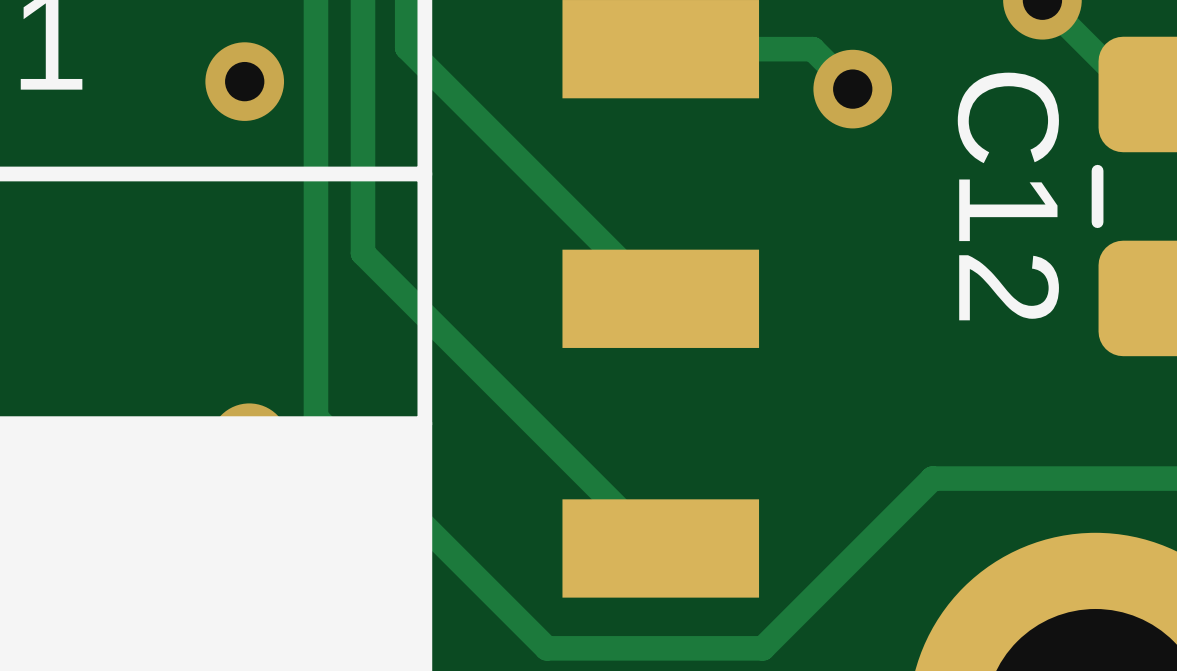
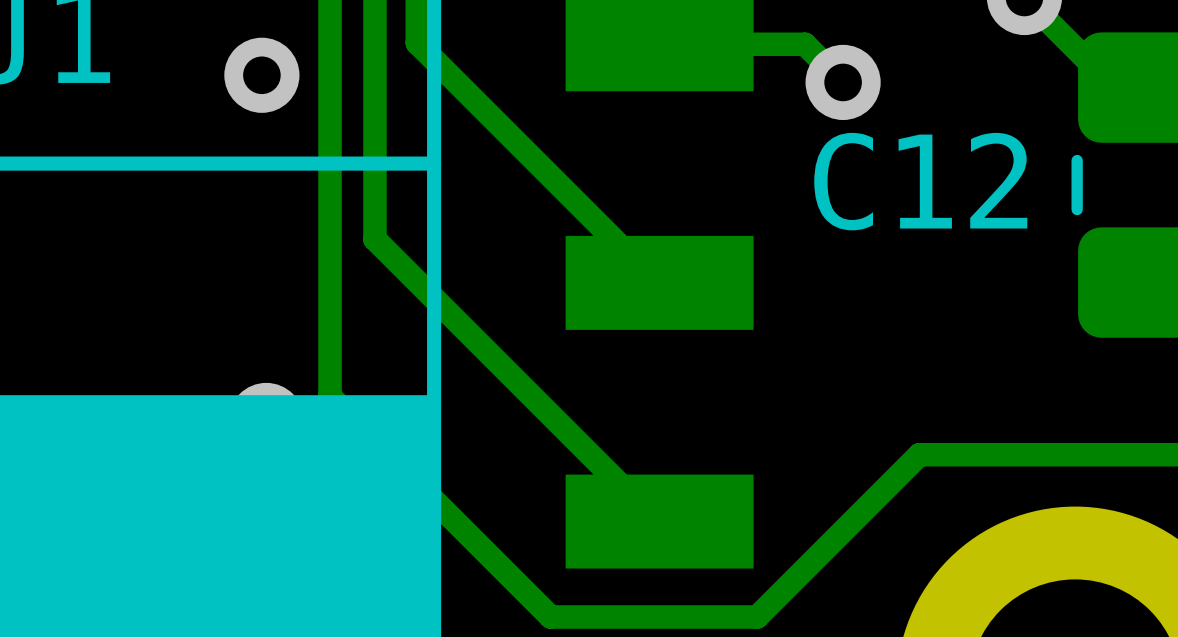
C12 name rotation: 0° (1008, 196) -> 90° counterclockwise (920, 181)

